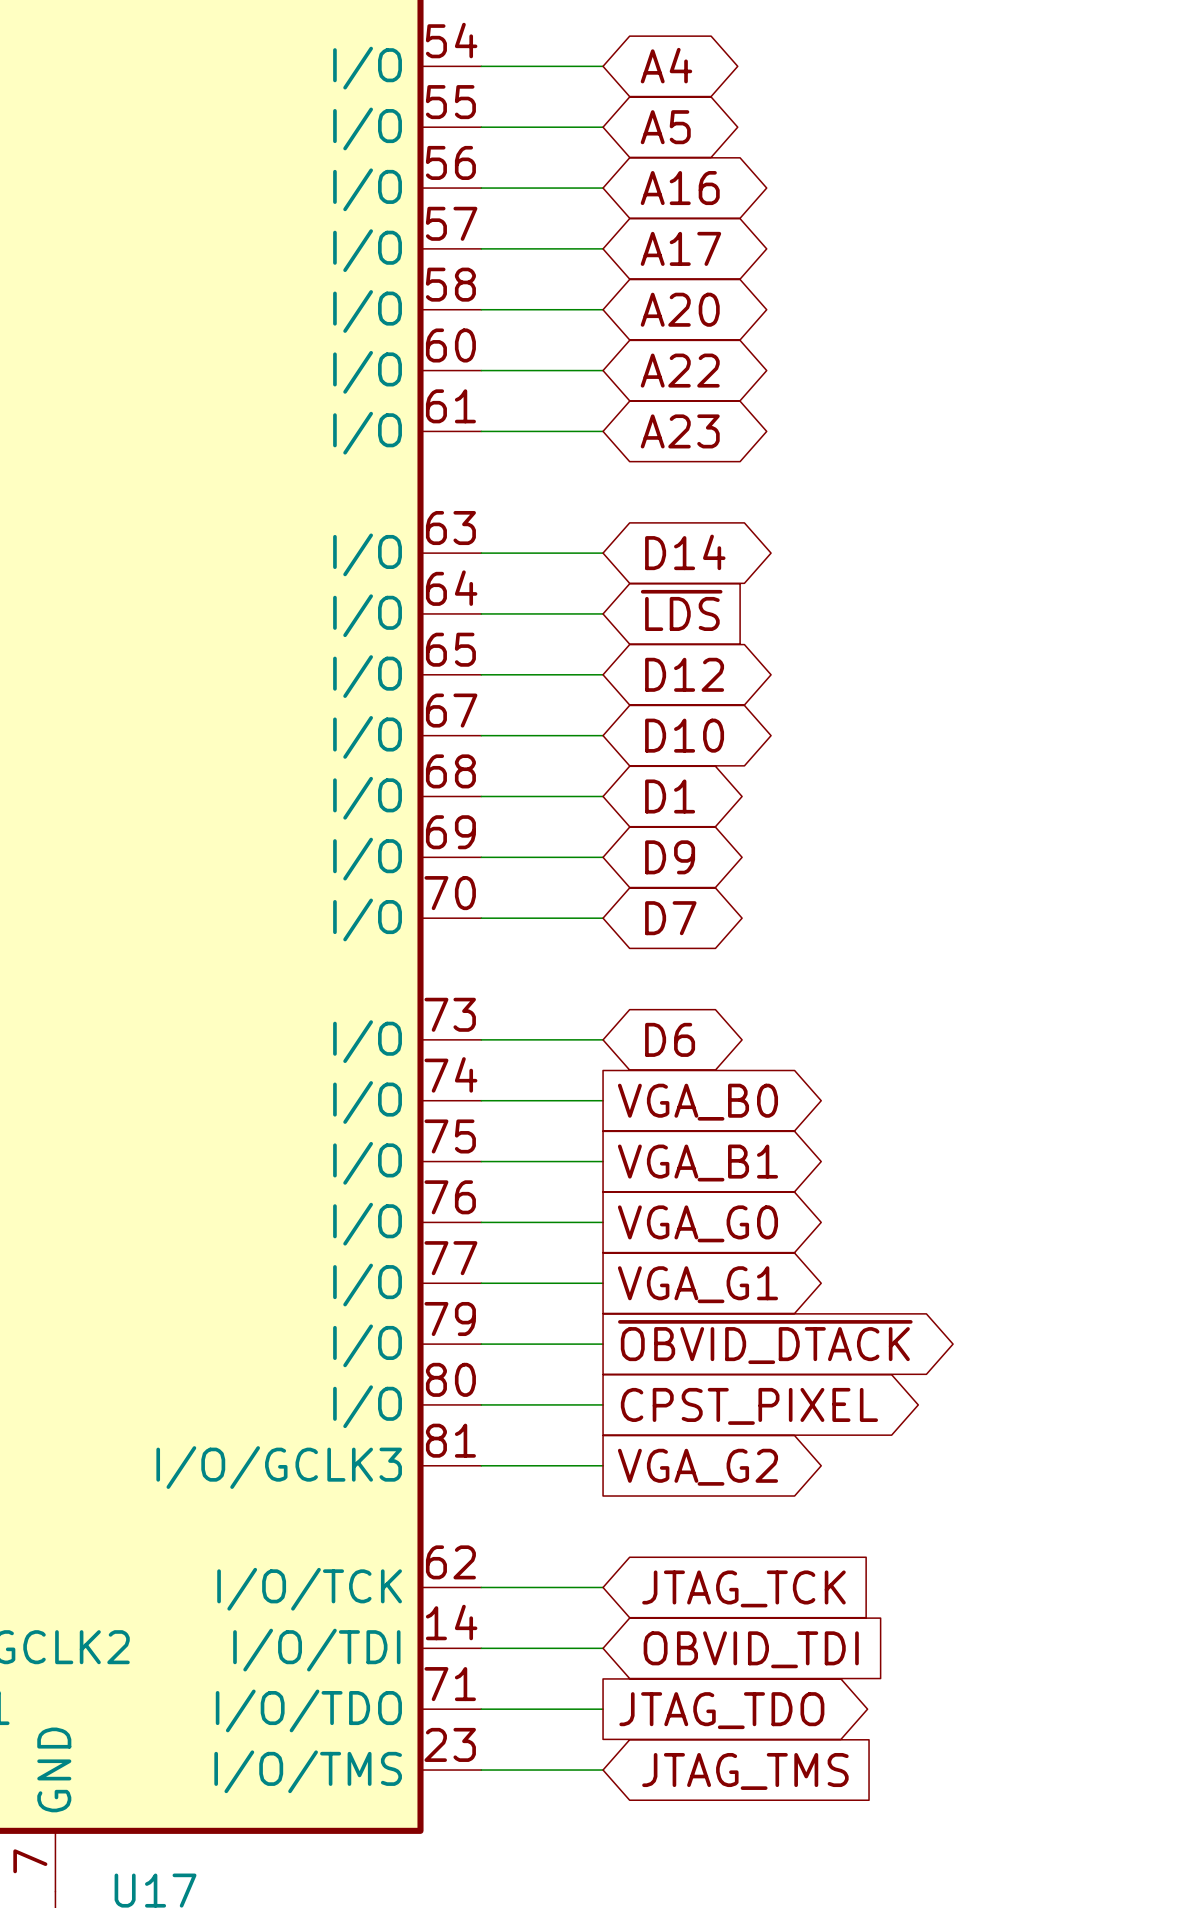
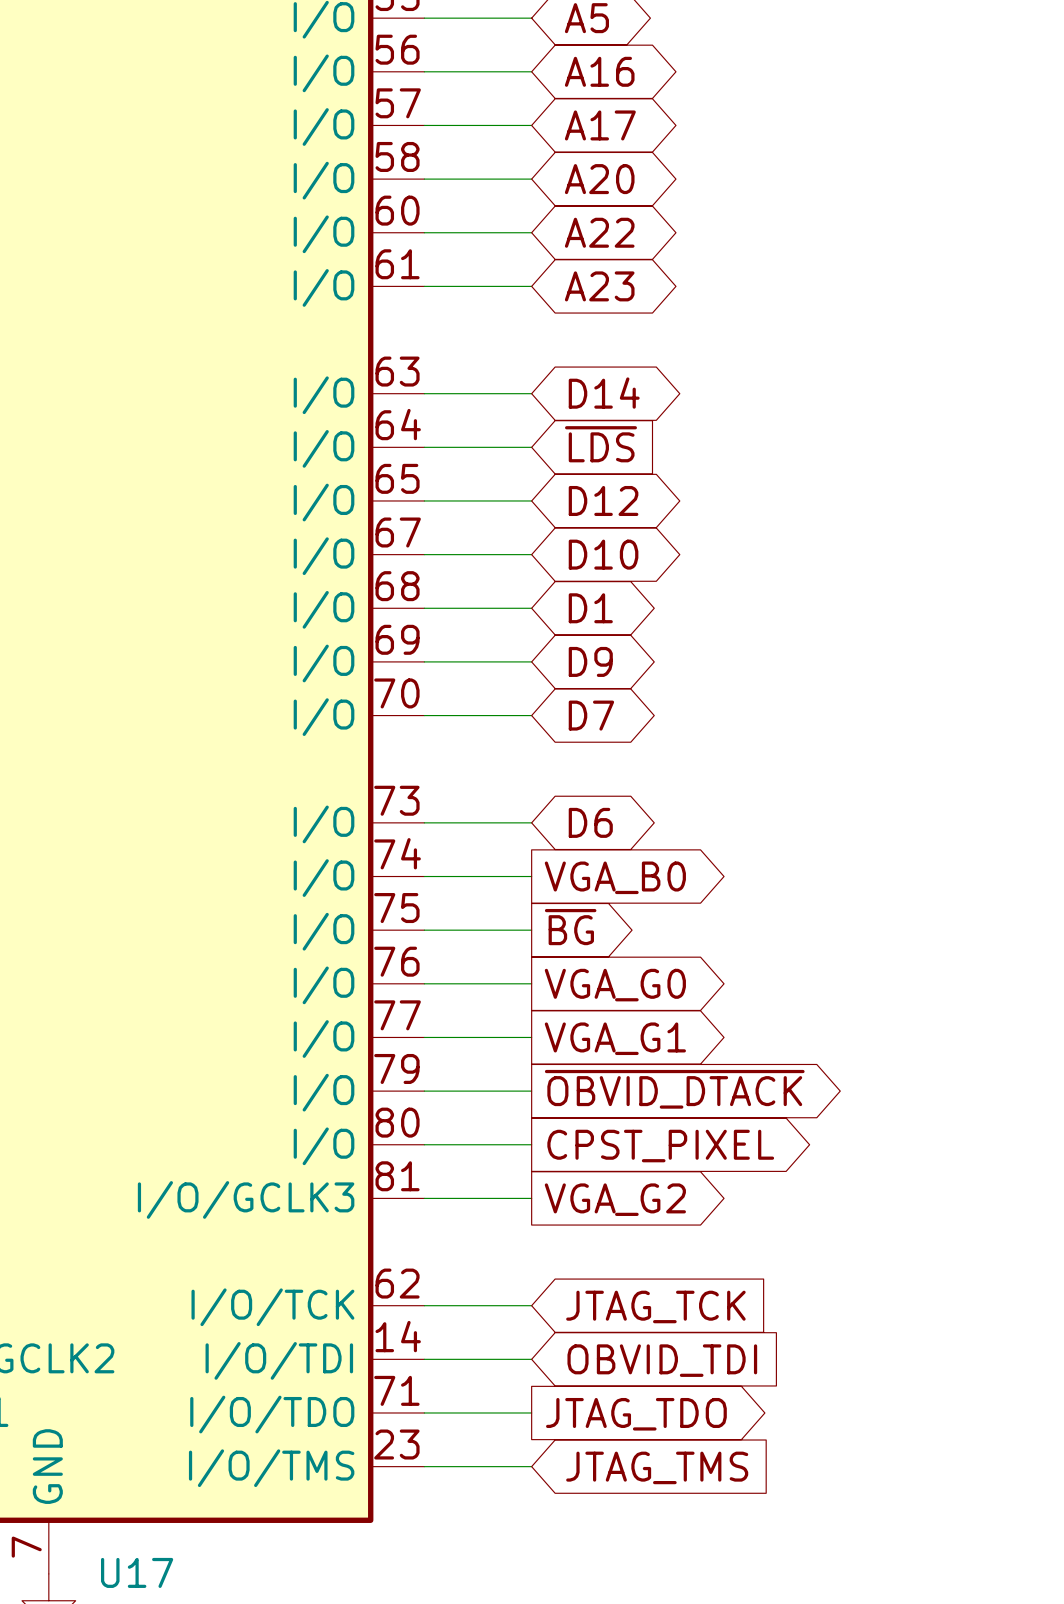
global label: VGA_B1 (697, 1163) -> ~{BG} (570, 927)

